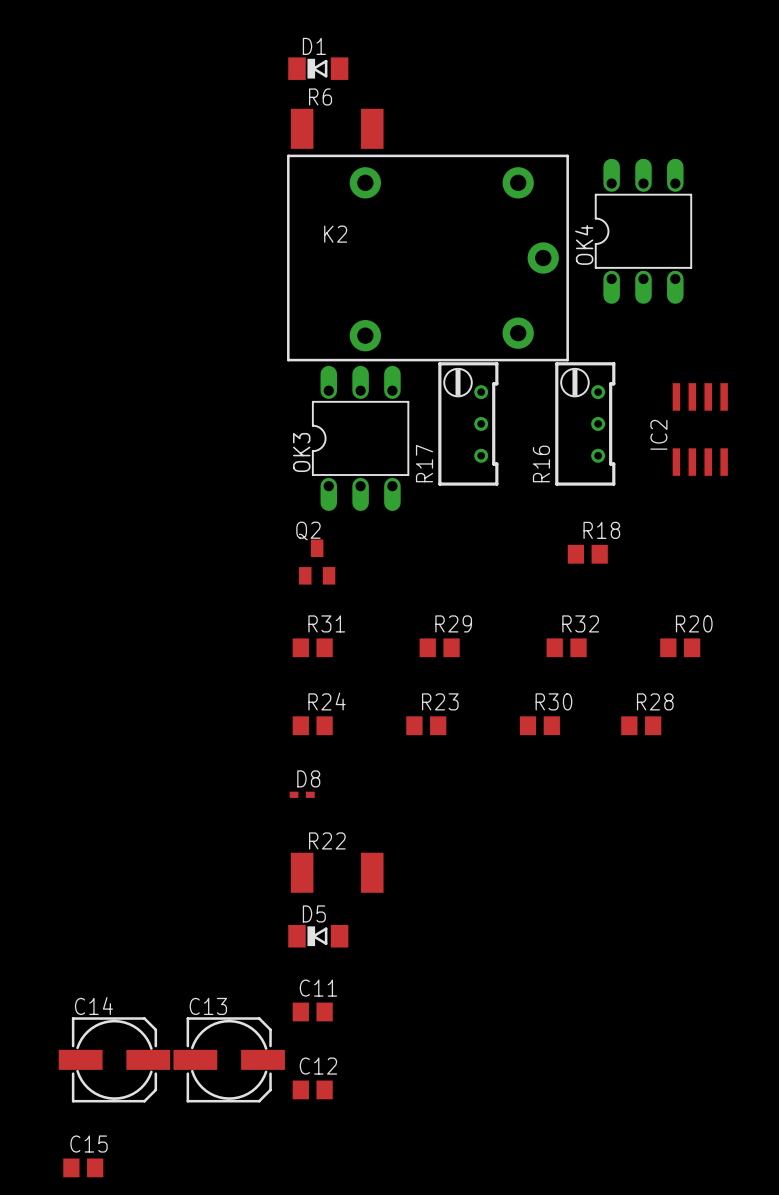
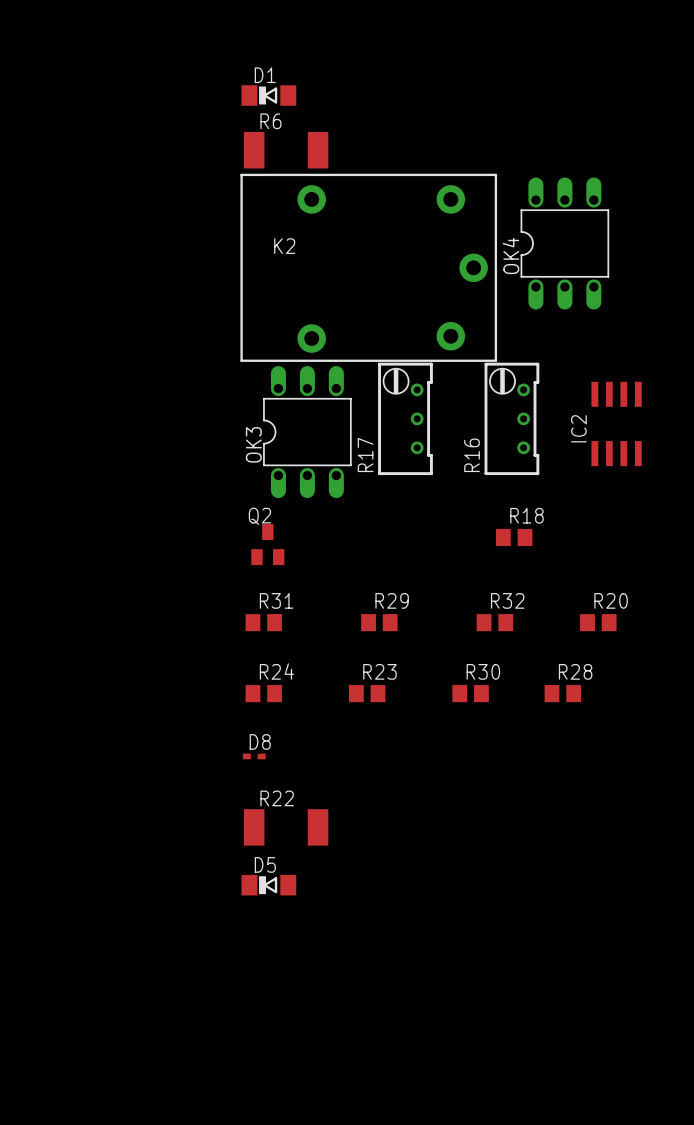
C11: (312, 1011) -> none
C14: (114, 1059) -> none
C13: (229, 1059) -> none
C12: (312, 1089) -> none
C15: (83, 1167) -> none

